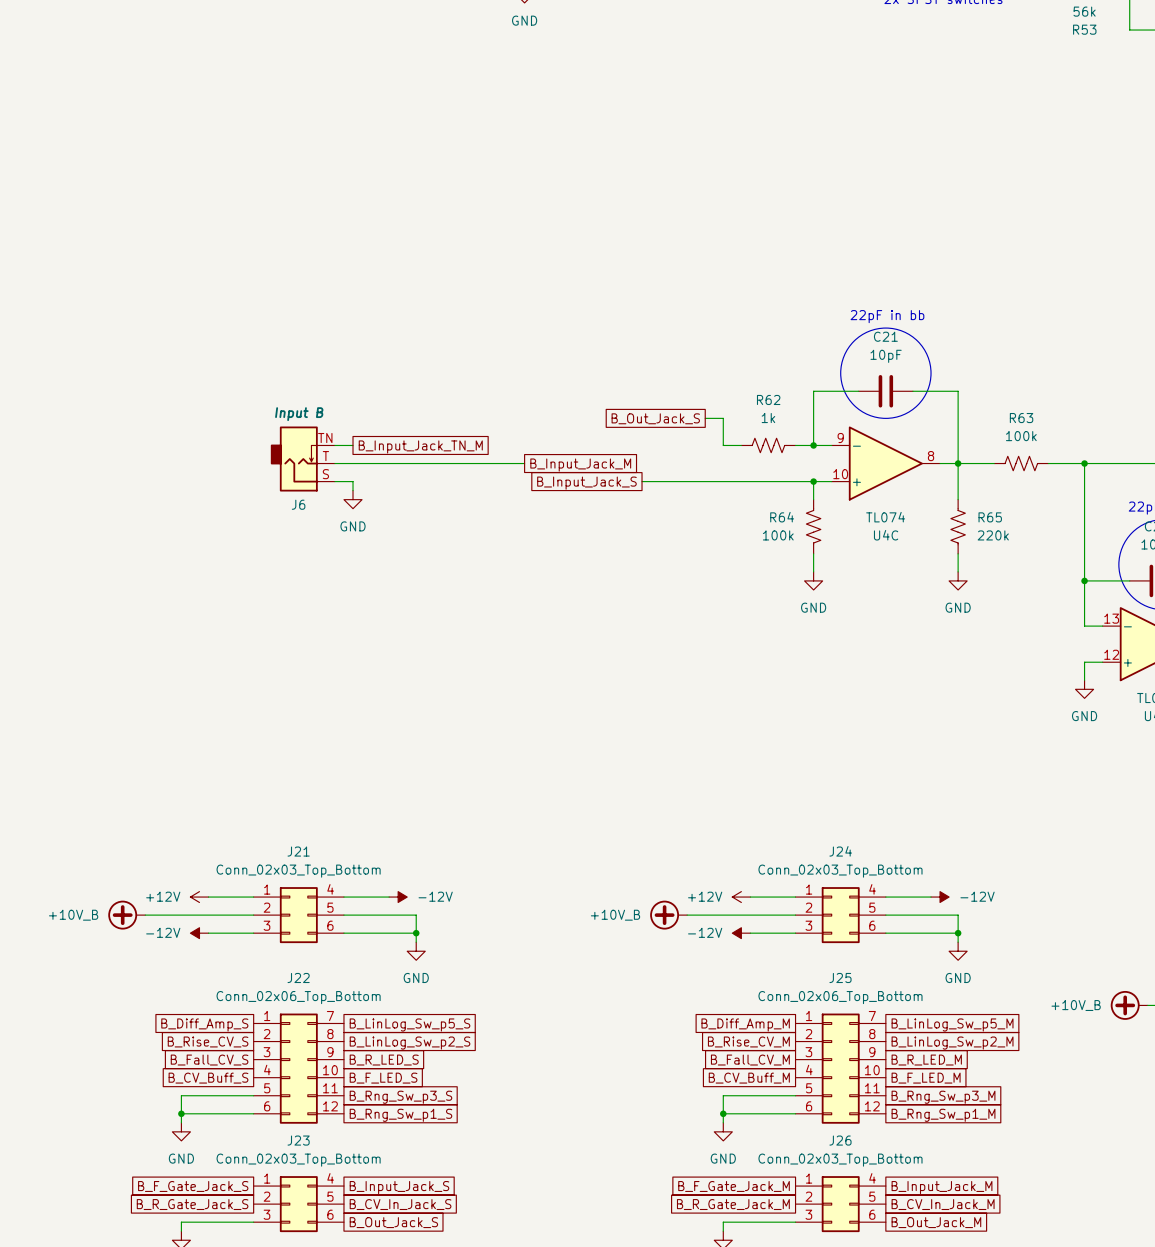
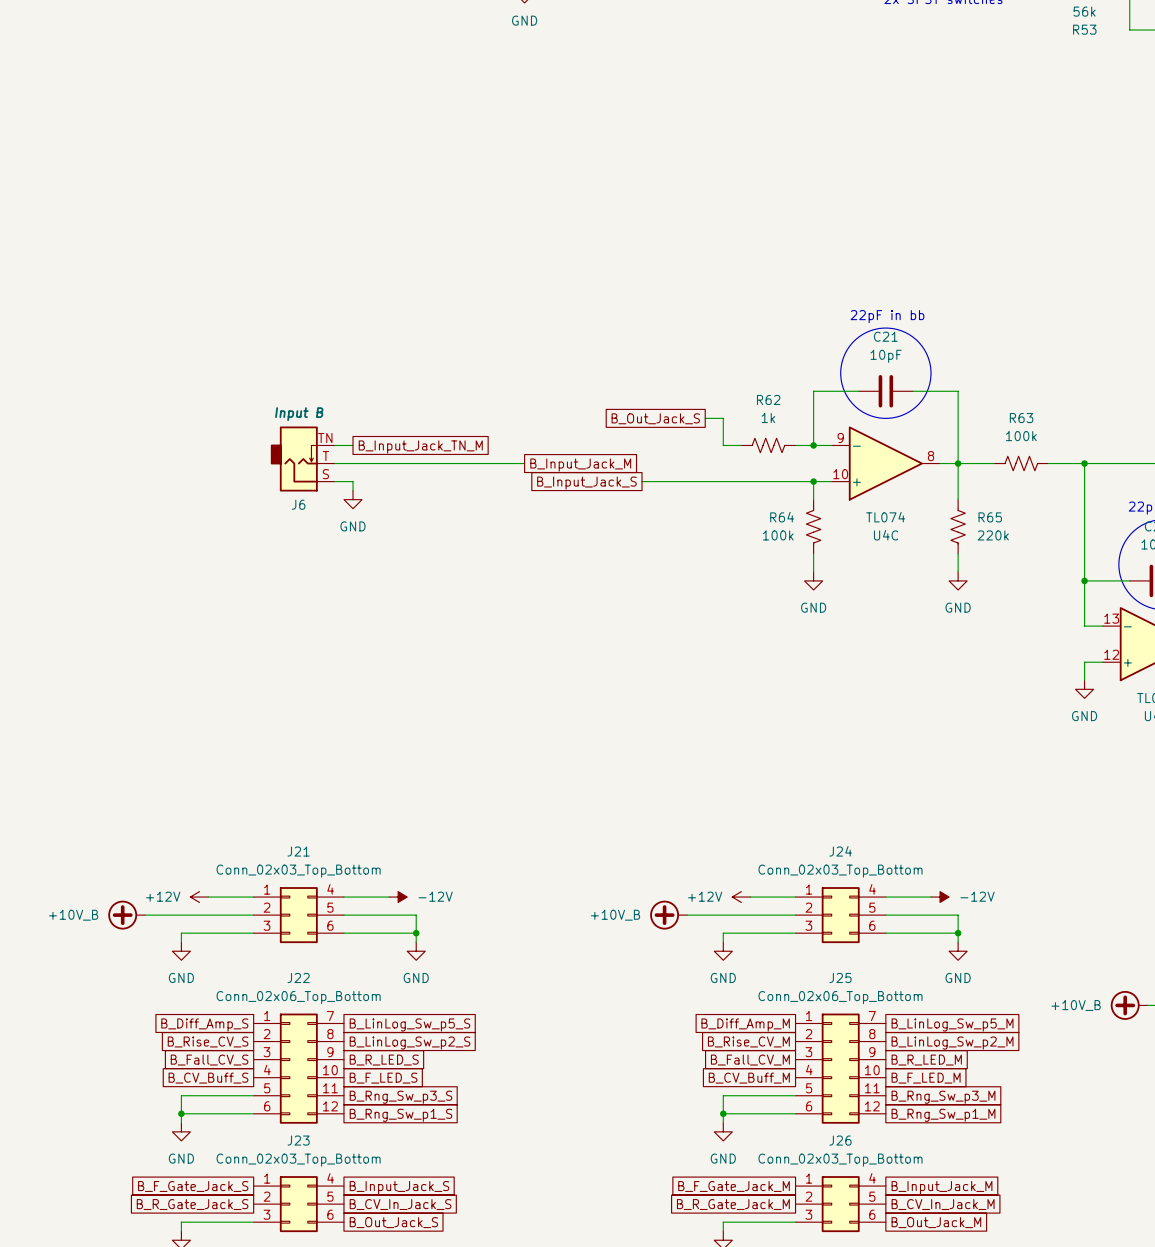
power symbol: -12V (199, 933) -> none
wire: none -> (208, 933) (181, 933) (181, 942)
power symbol: -12V (741, 933) -> none
wire: none -> (750, 933) (723, 933) (723, 942)
power symbol: none -> GND (181, 951)
power symbol: none -> GND (723, 951)

